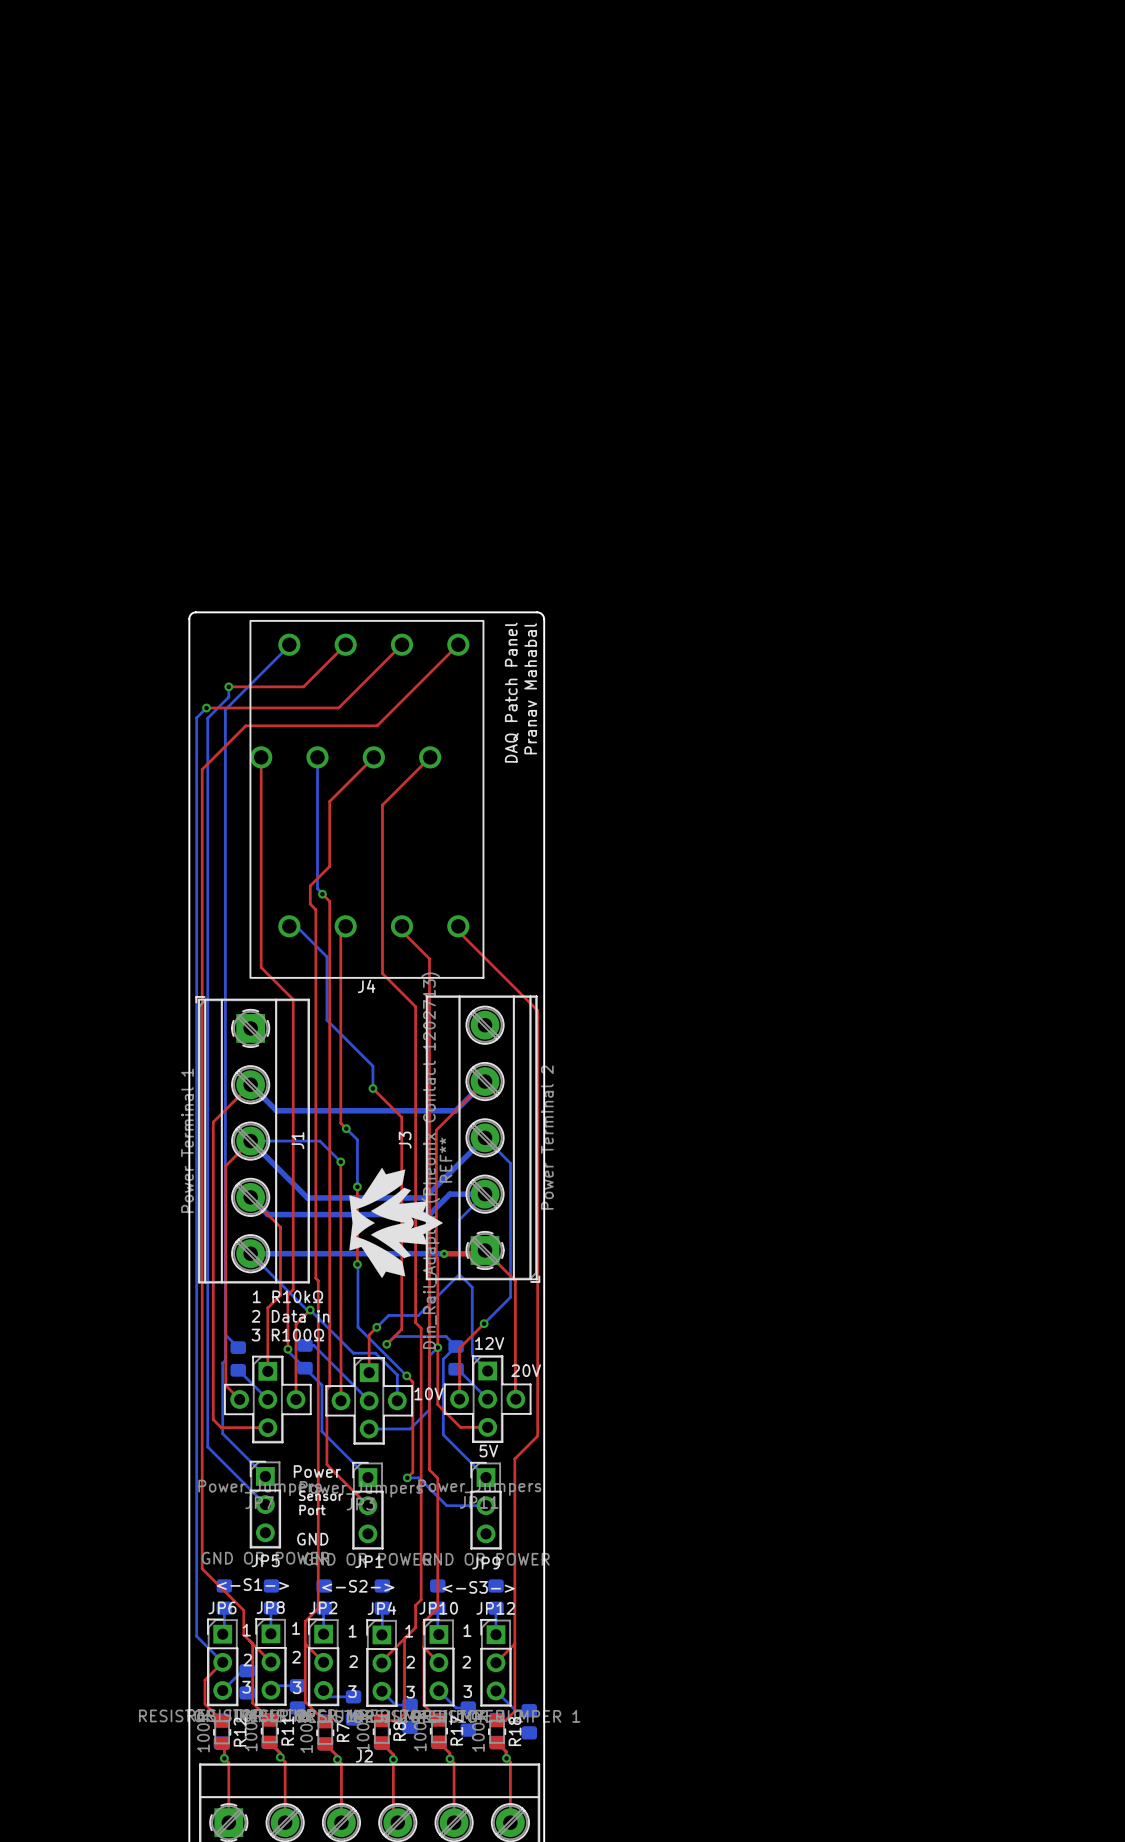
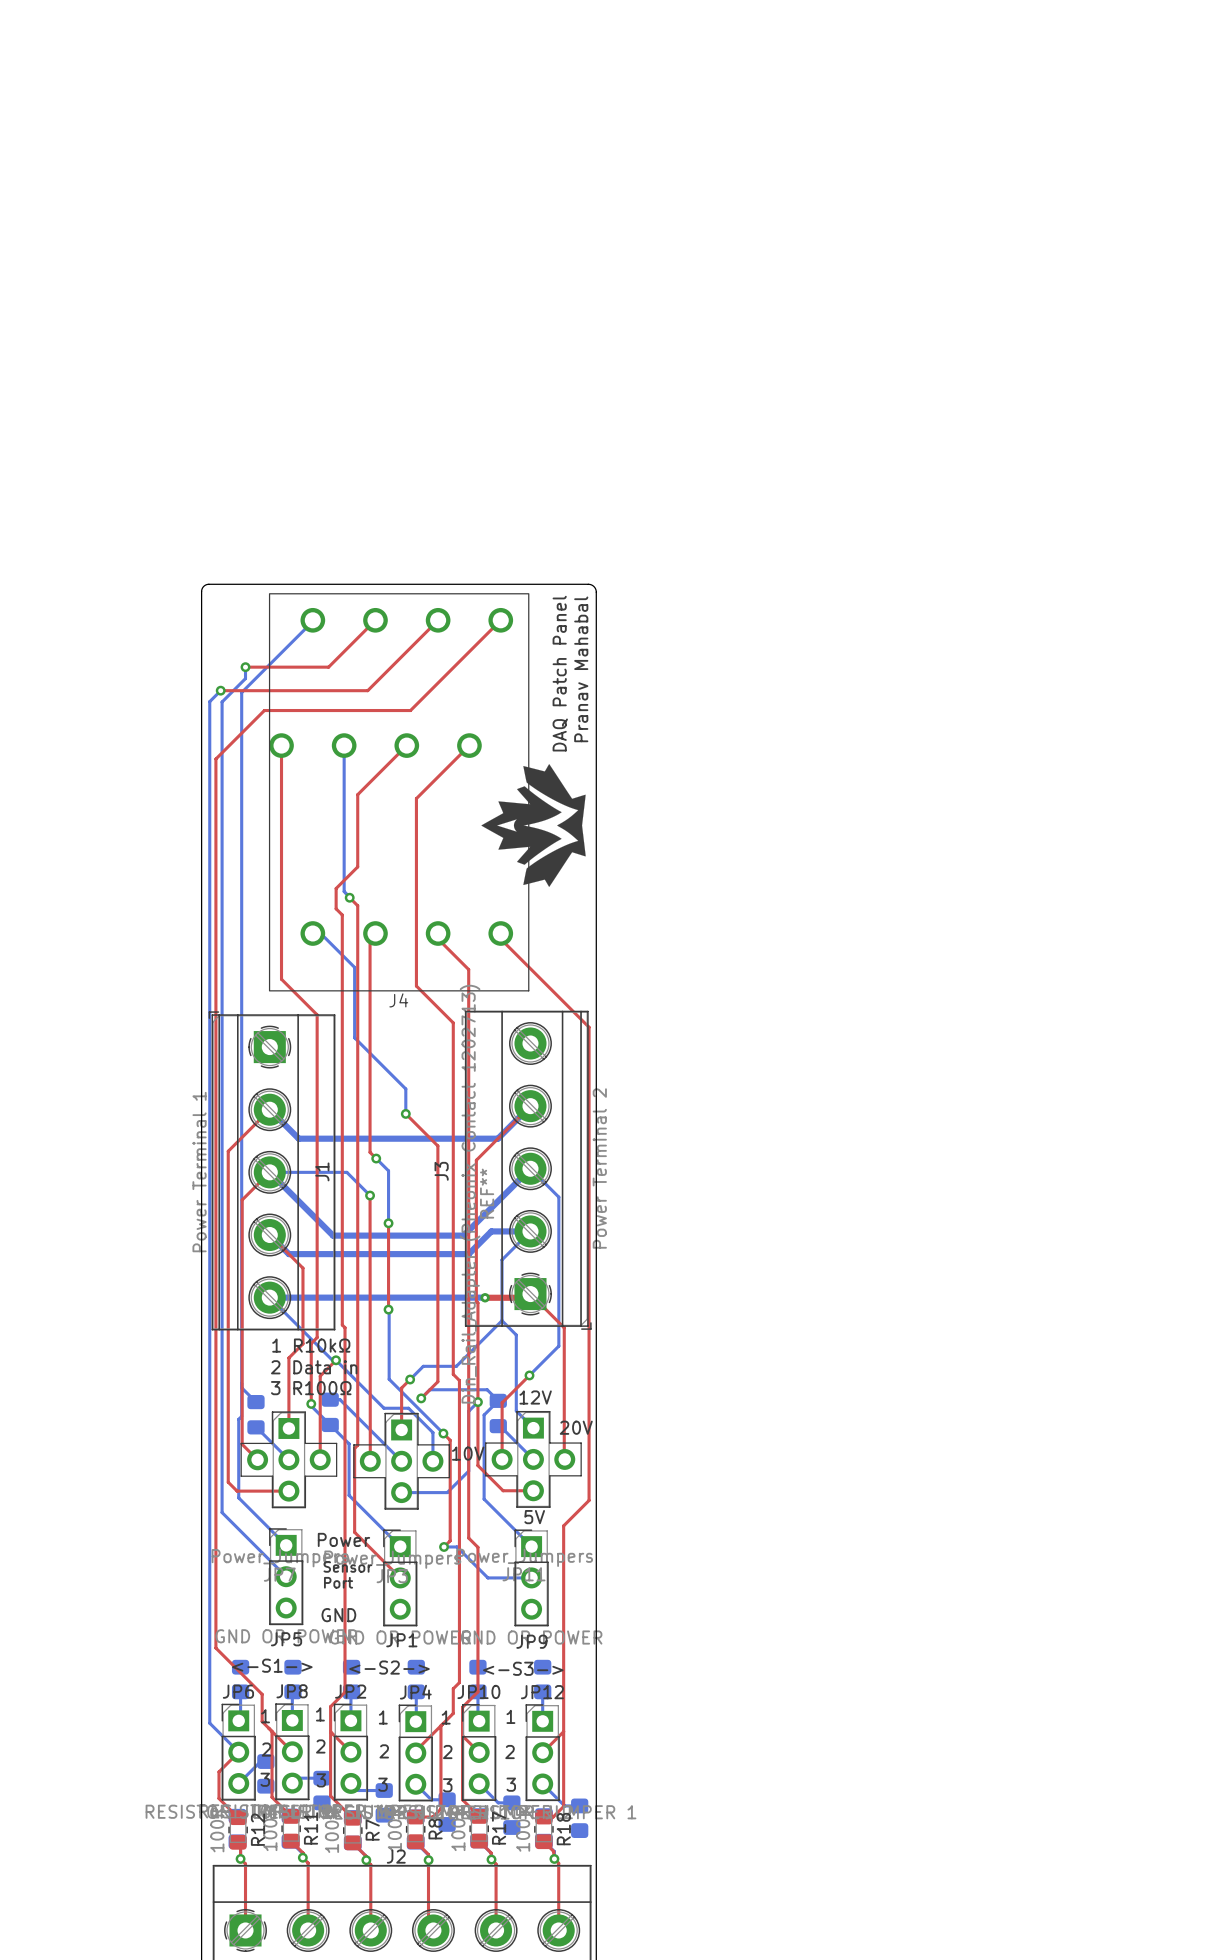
drawing: none -> [481, 764, 586, 887]
drawing: [349, 1167, 444, 1279] -> none

